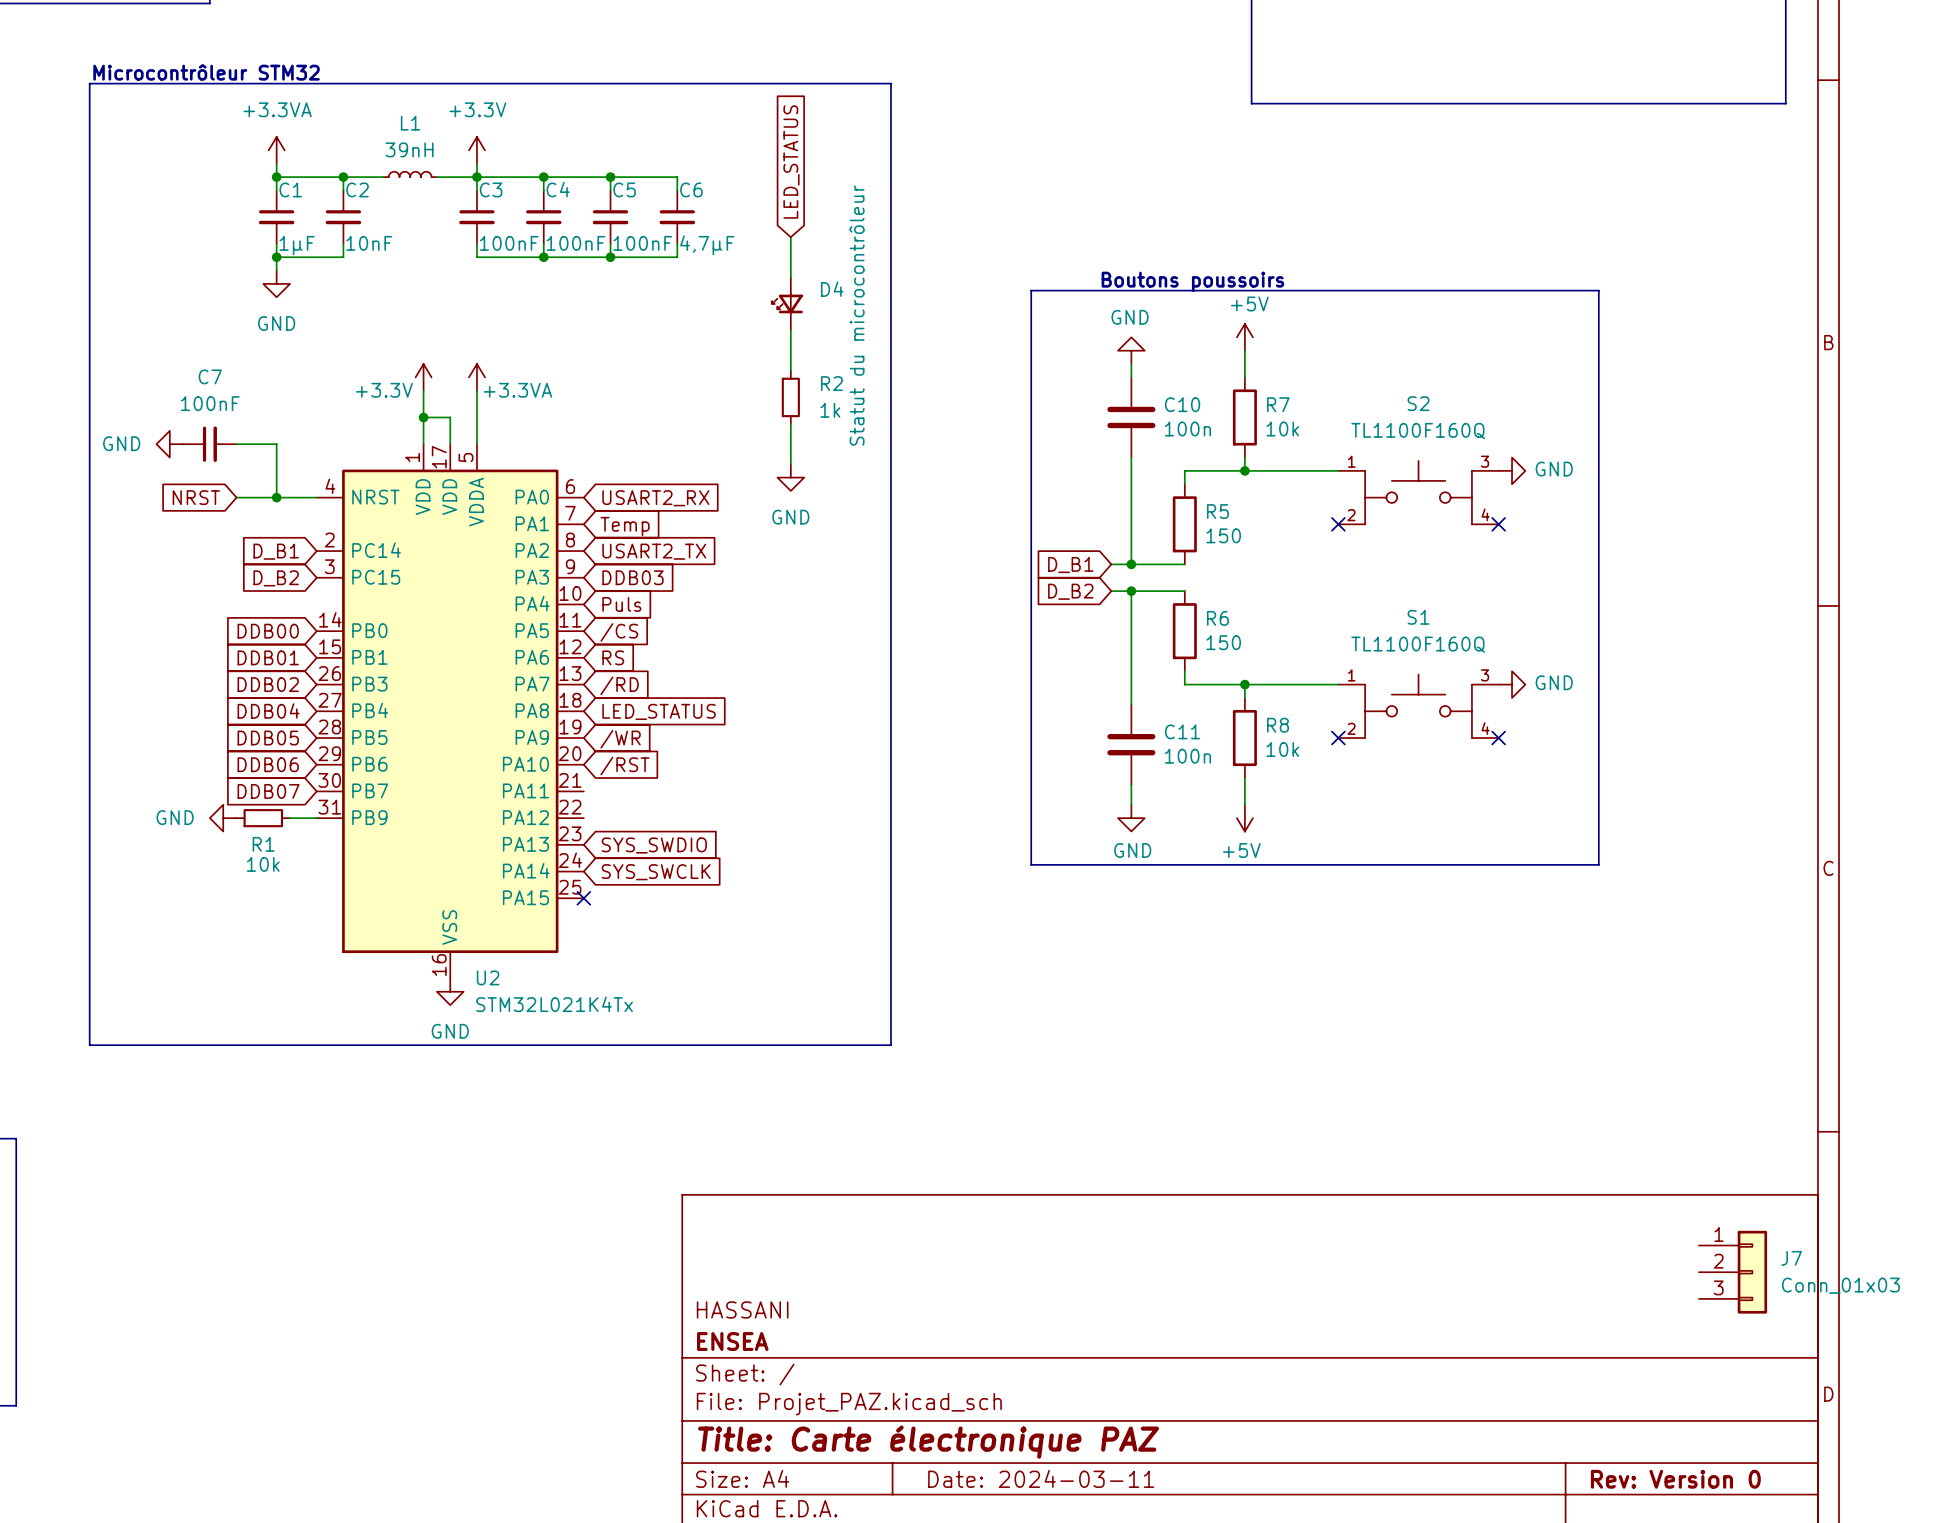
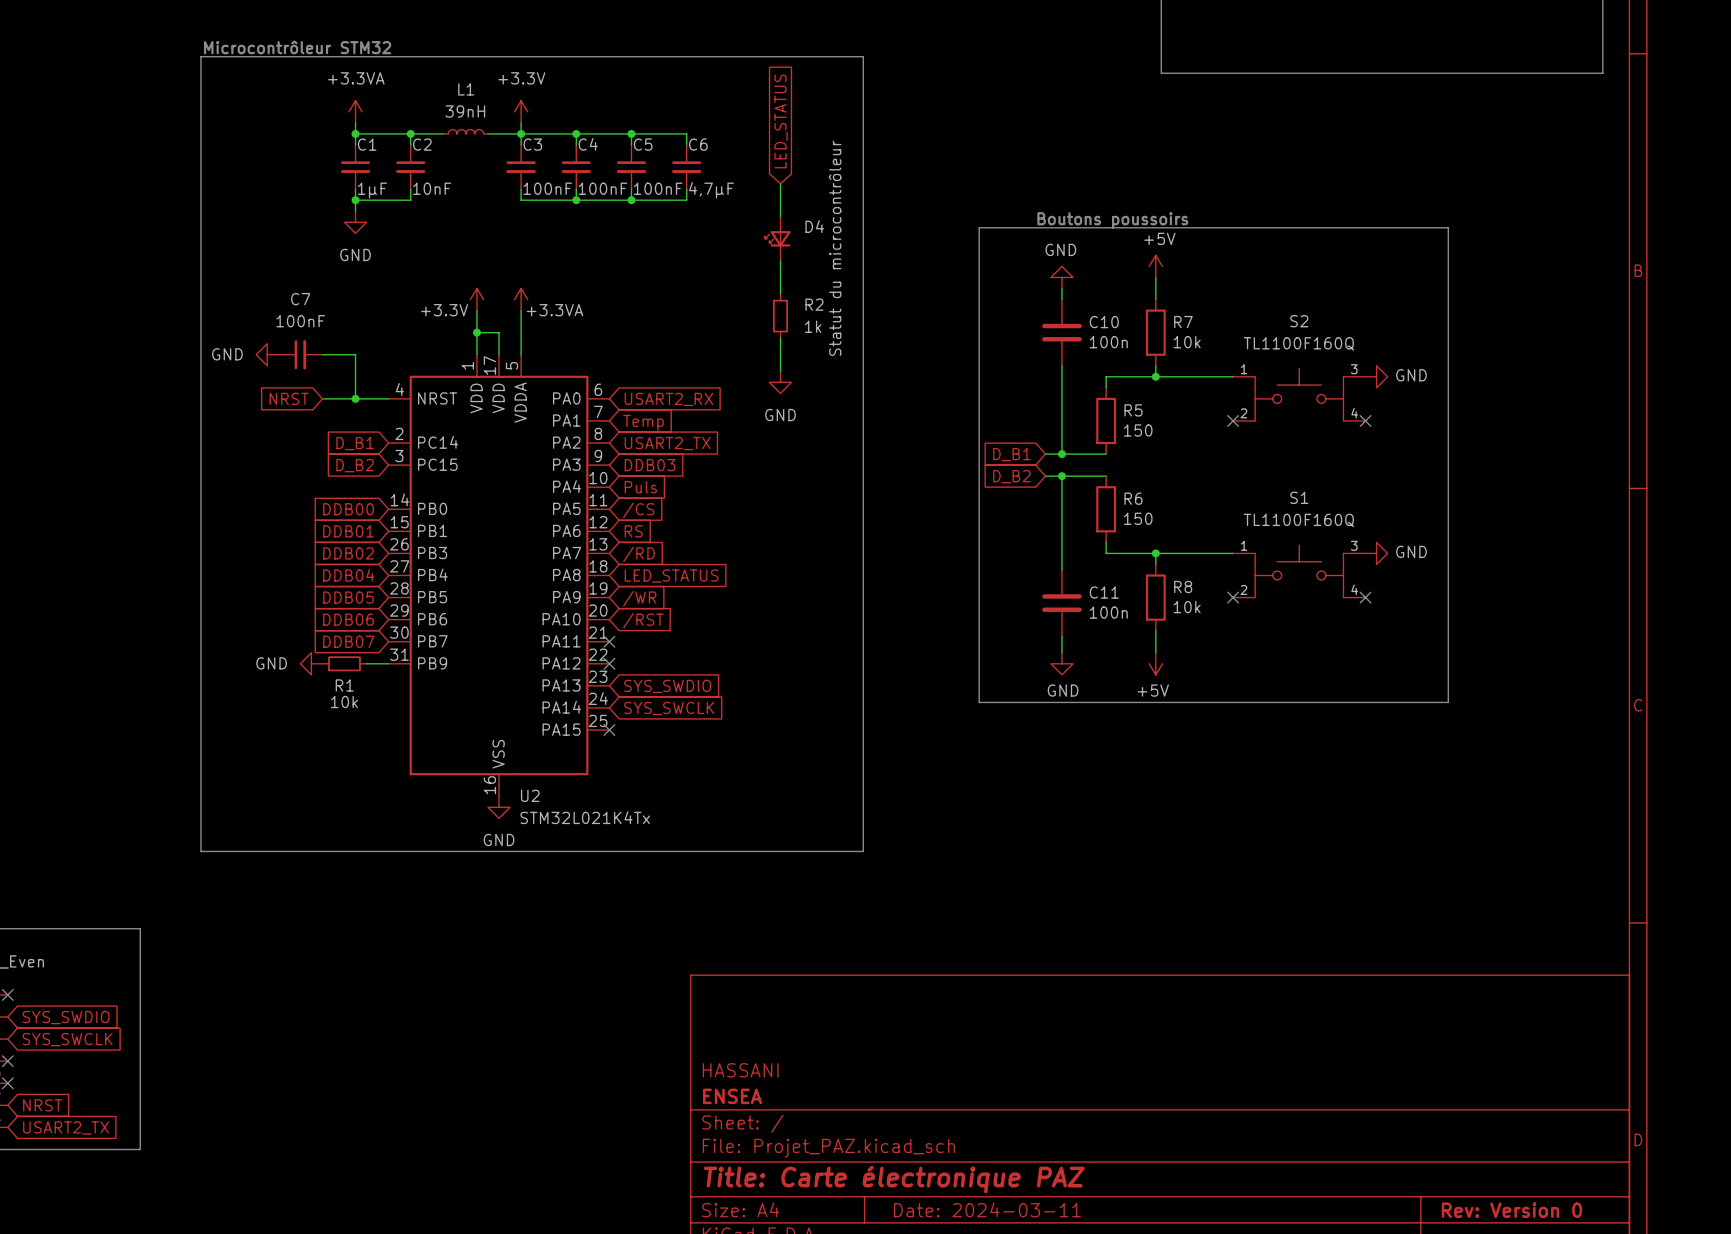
no-connect mark: none -> (609, 641)
no-connect mark: none -> (609, 663)
J7: Conn_01x03 (1733, 1272) -> none

